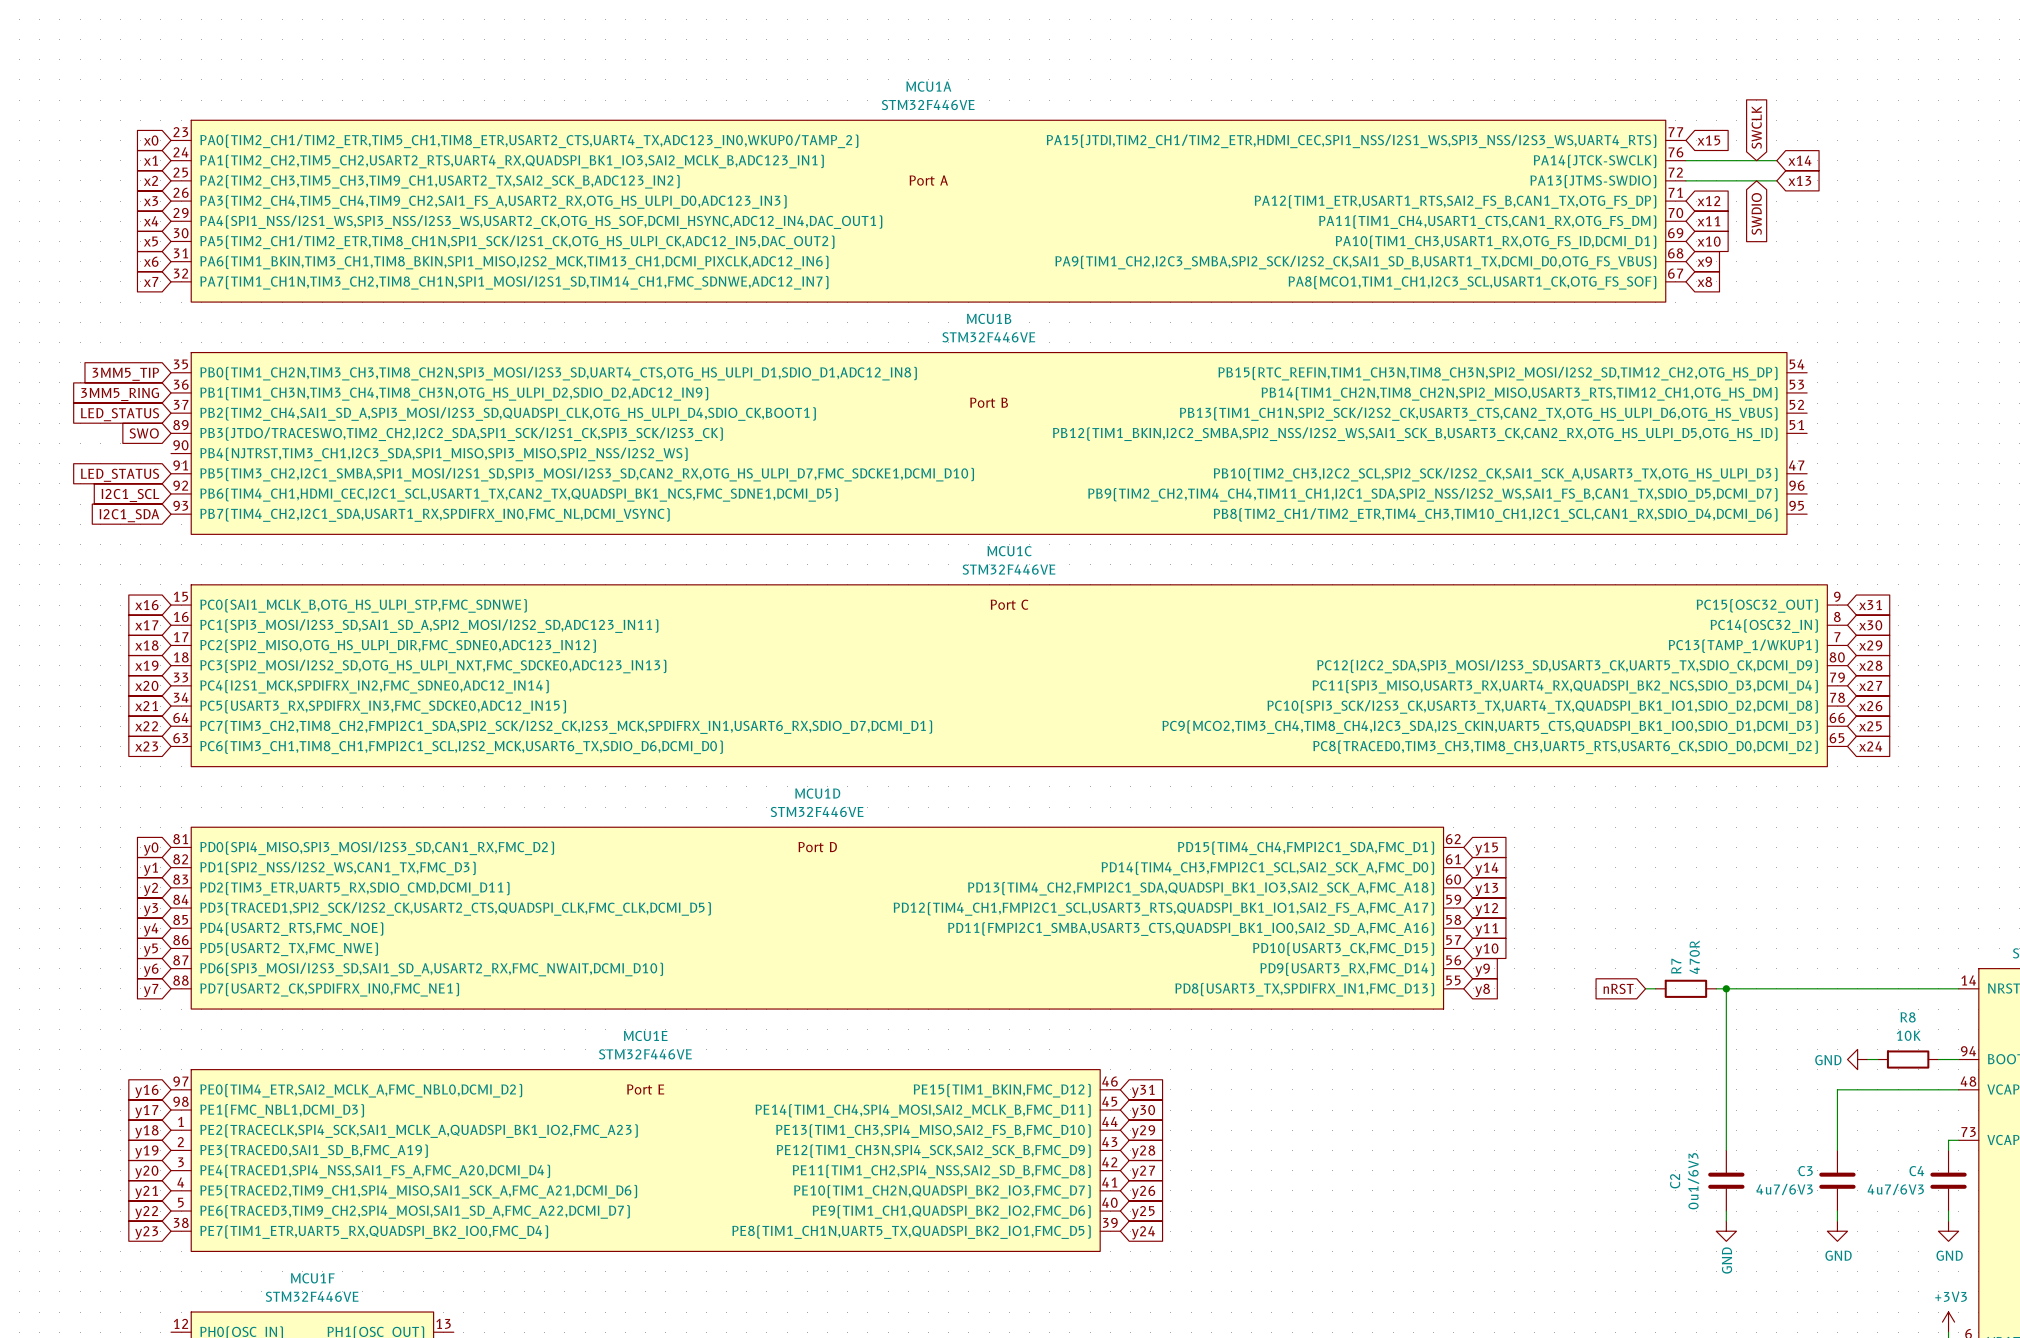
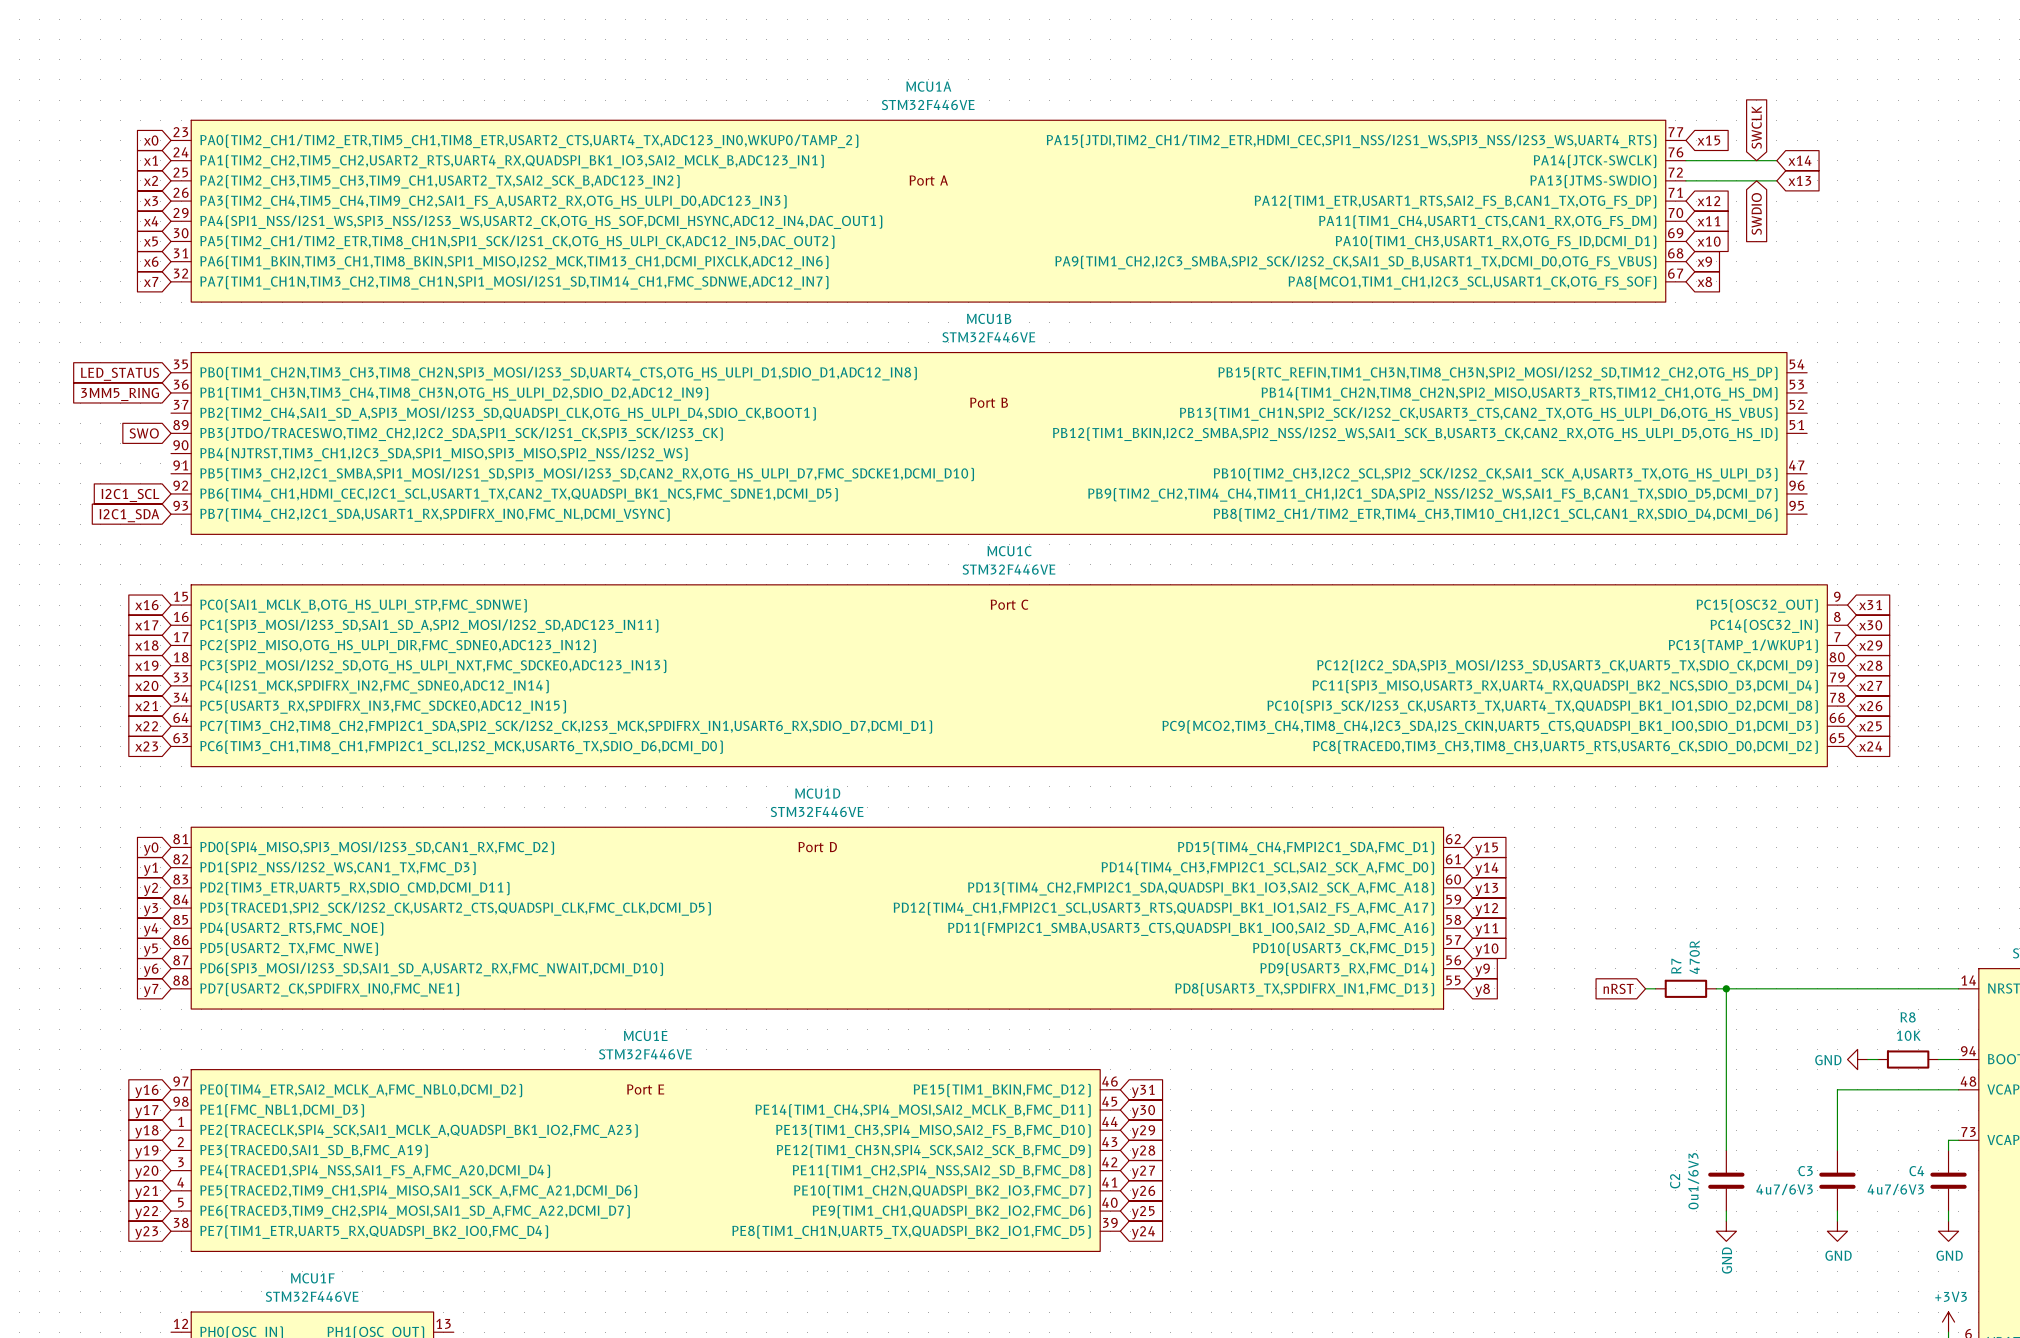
global label: 3MM5_TIP (125, 374) -> LED_STATUS (120, 374)
global label: LED_STATUS (120, 414) -> none
global label: LED_STATUS (120, 475) -> none

